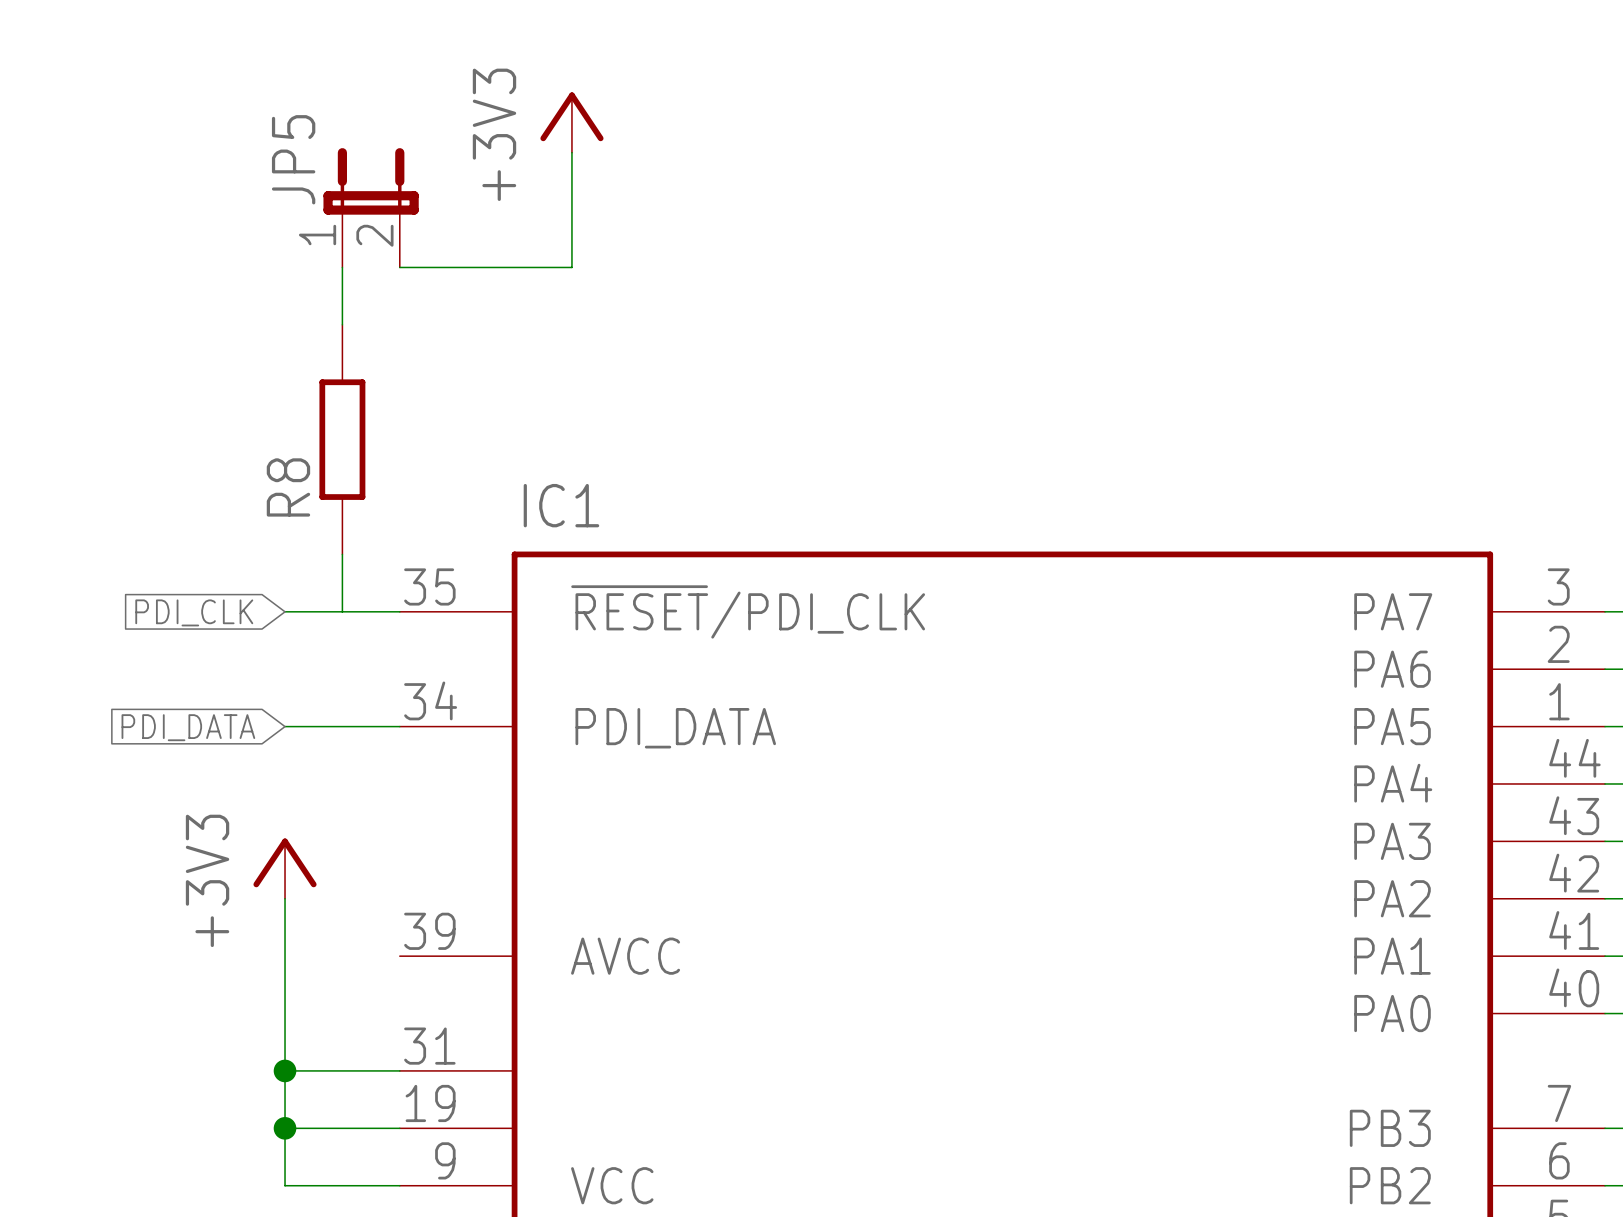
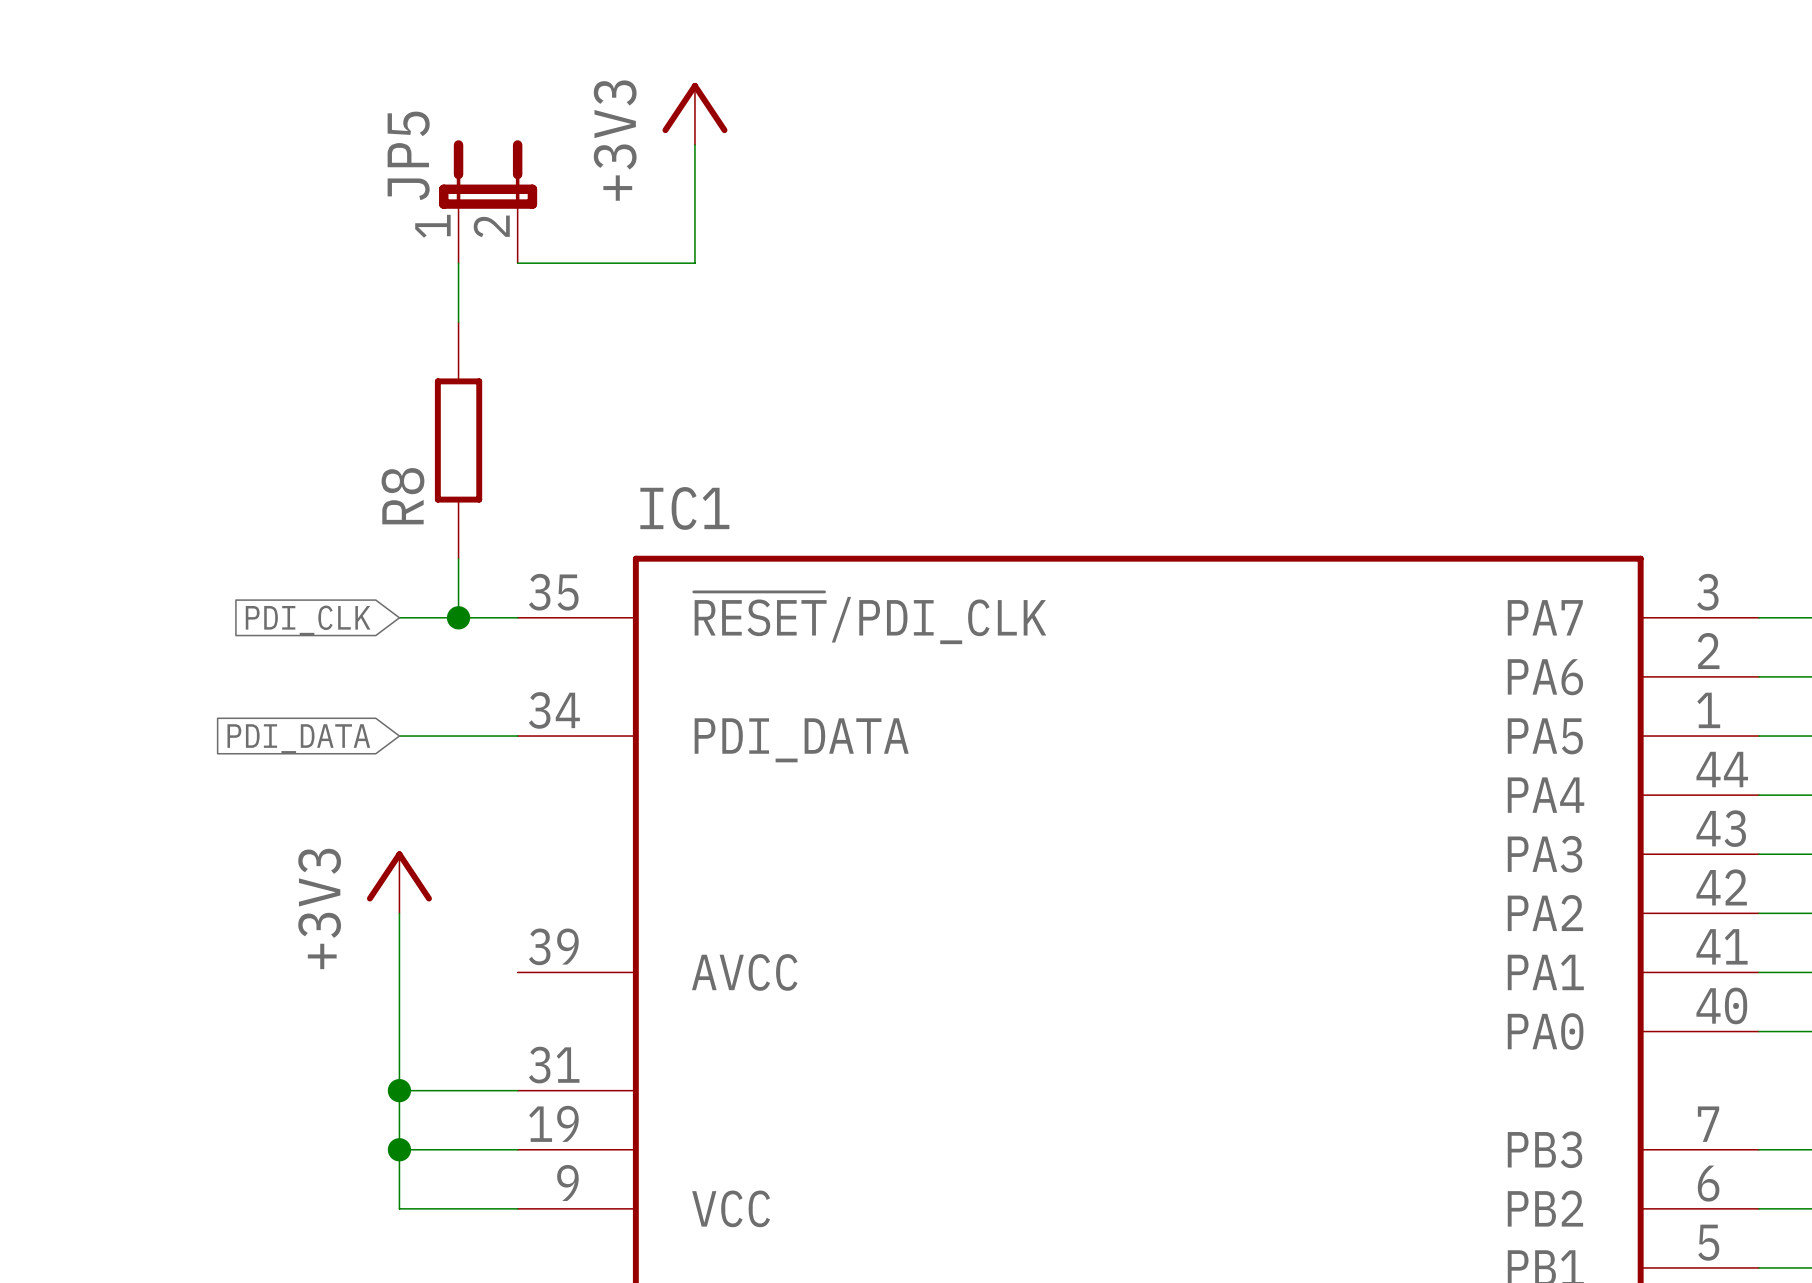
junction: none -> (458, 617)

